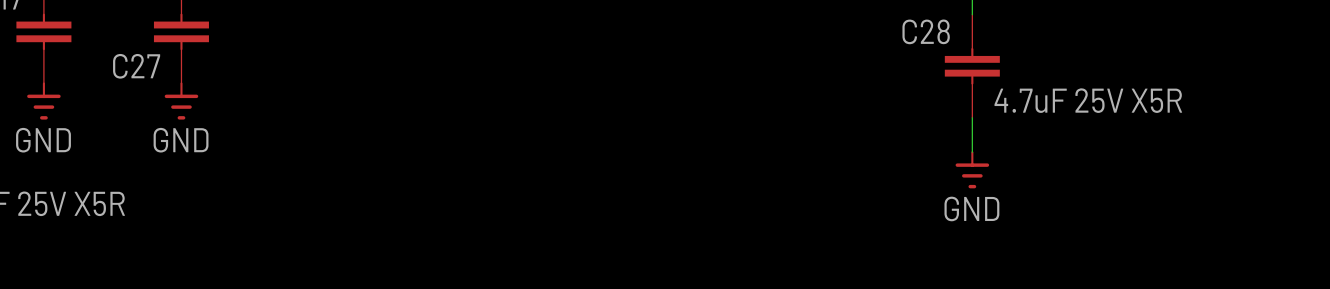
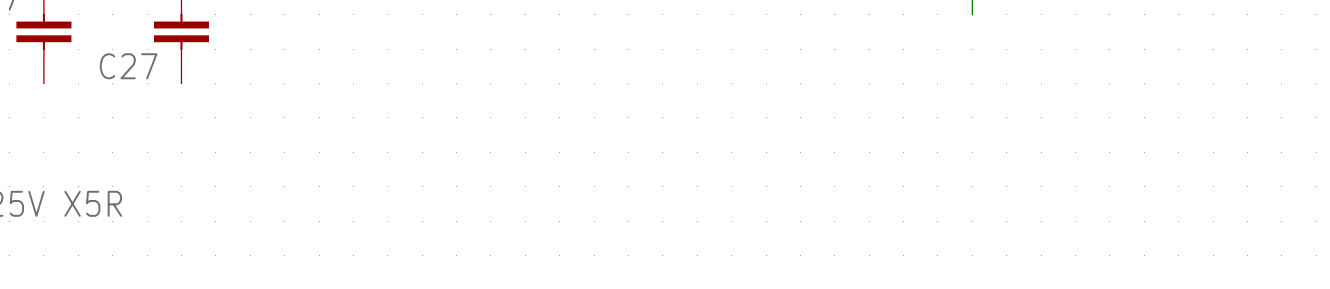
C28: 4.7uF 25V X5R (972, 66) -> none
power symbol: GND (43, 101) -> none
power symbol: GND (181, 101) -> none
wire: (972, 117) (972, 152) -> none
power symbol: GND (972, 169) -> none

